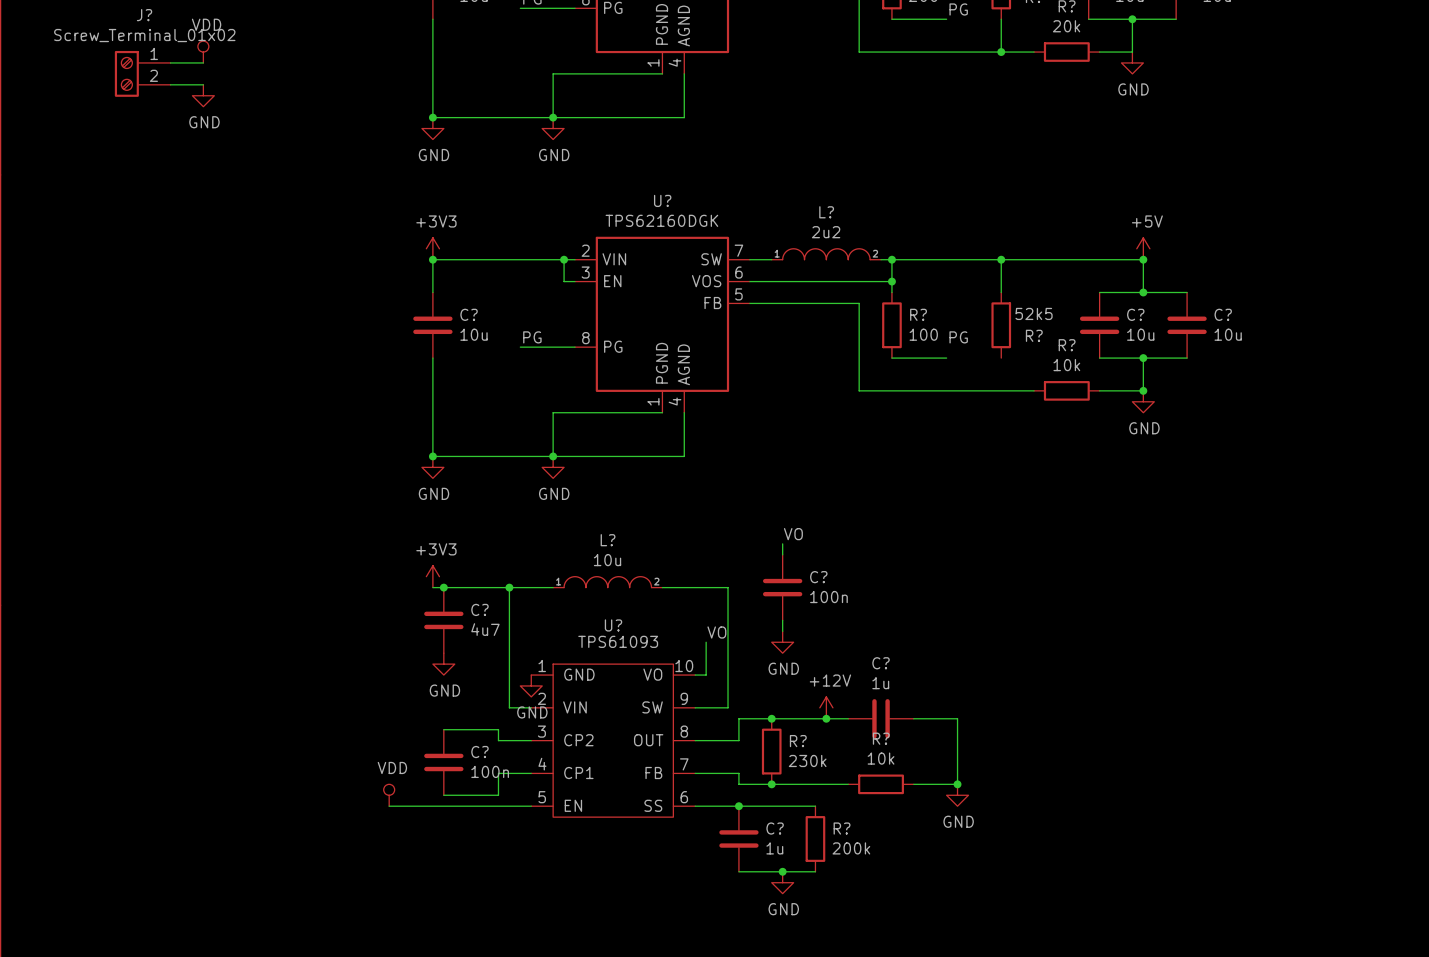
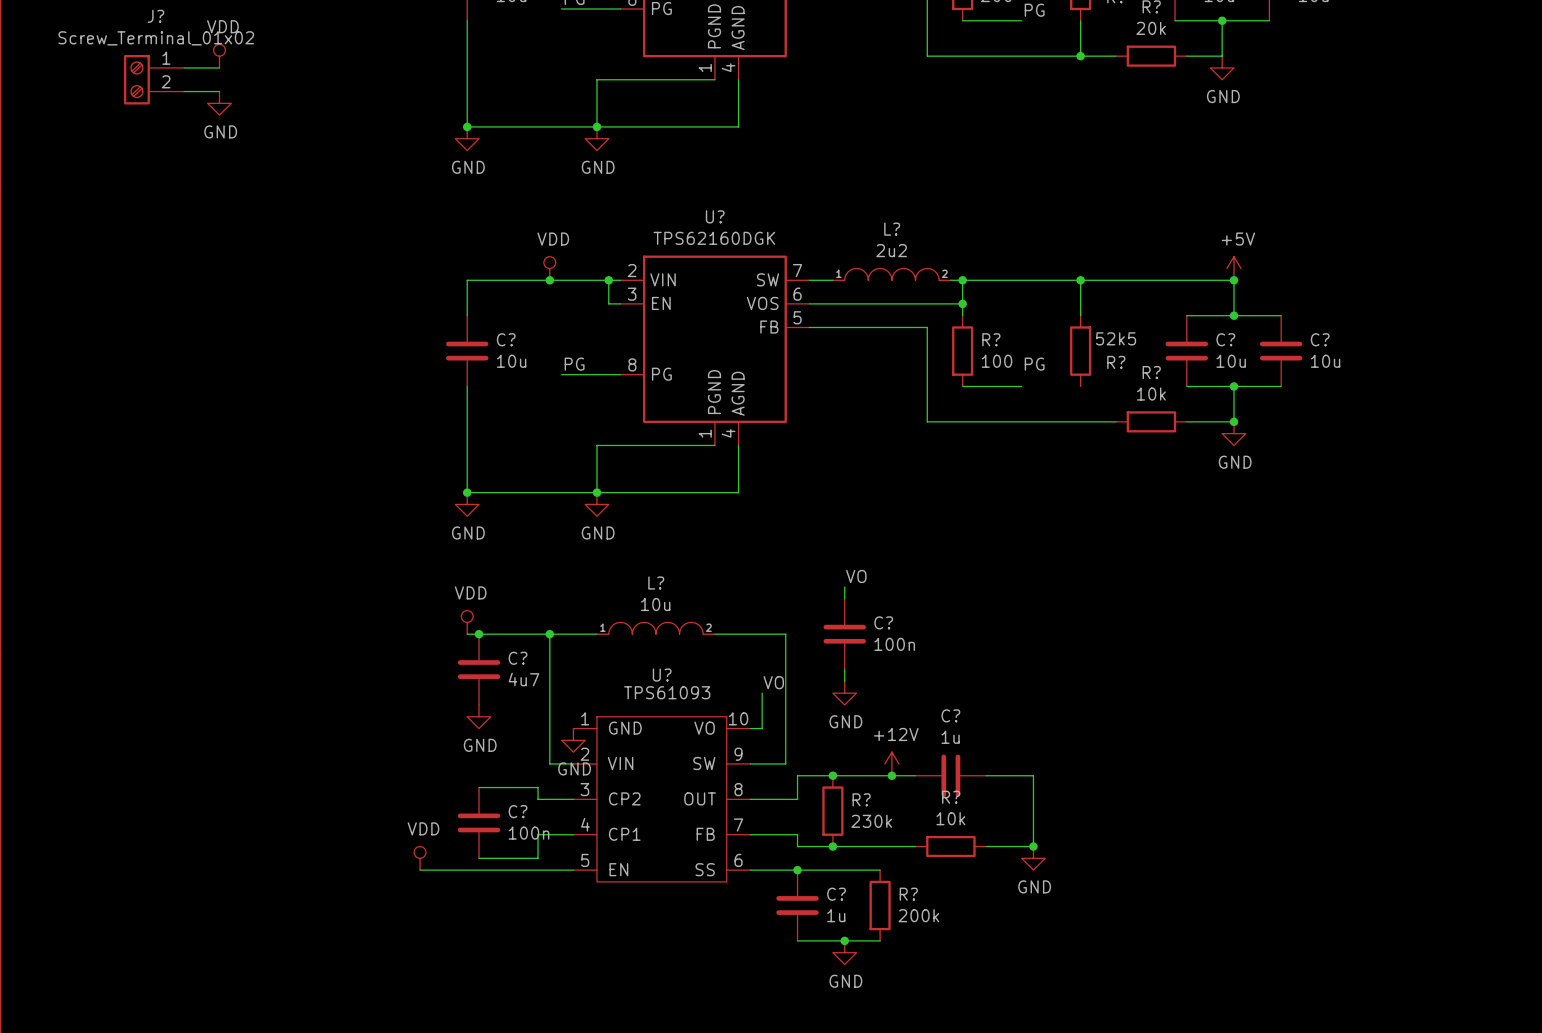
power symbol: +3V3 (432, 248) -> none
power symbol: none -> VDD (549, 268)
junction: (432, 259) -> none
junction: none -> (549, 280)
power symbol: +3V3 (432, 576) -> VDD (467, 622)

